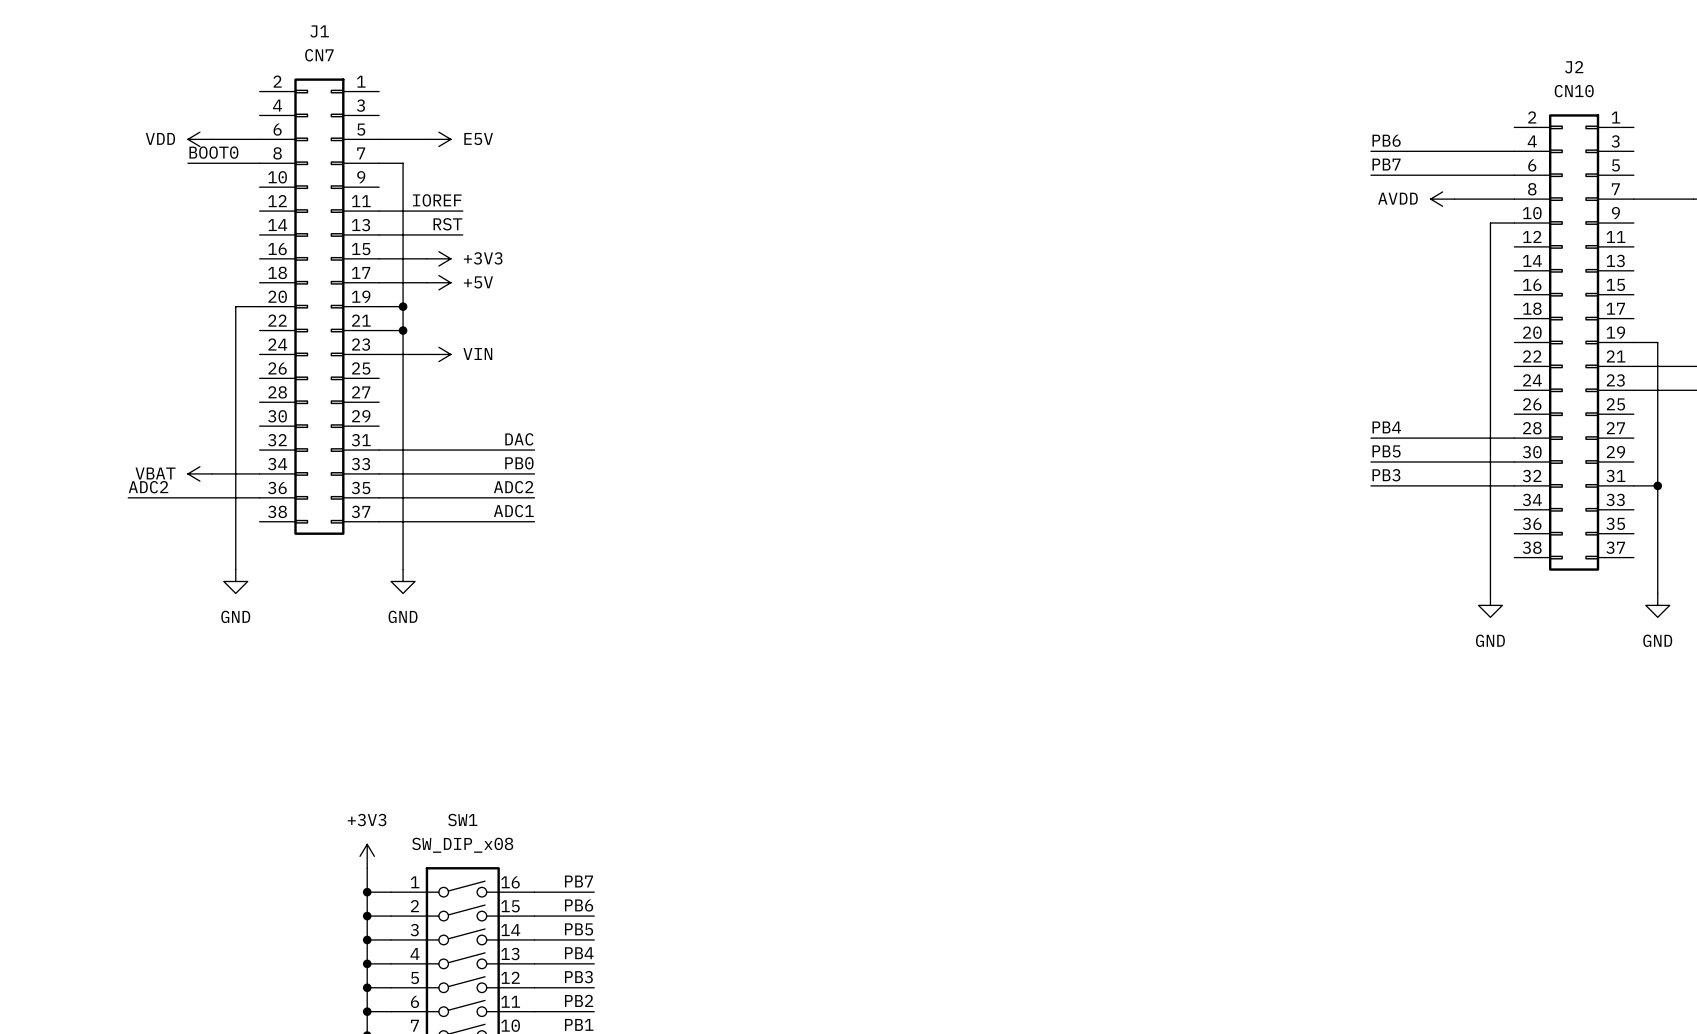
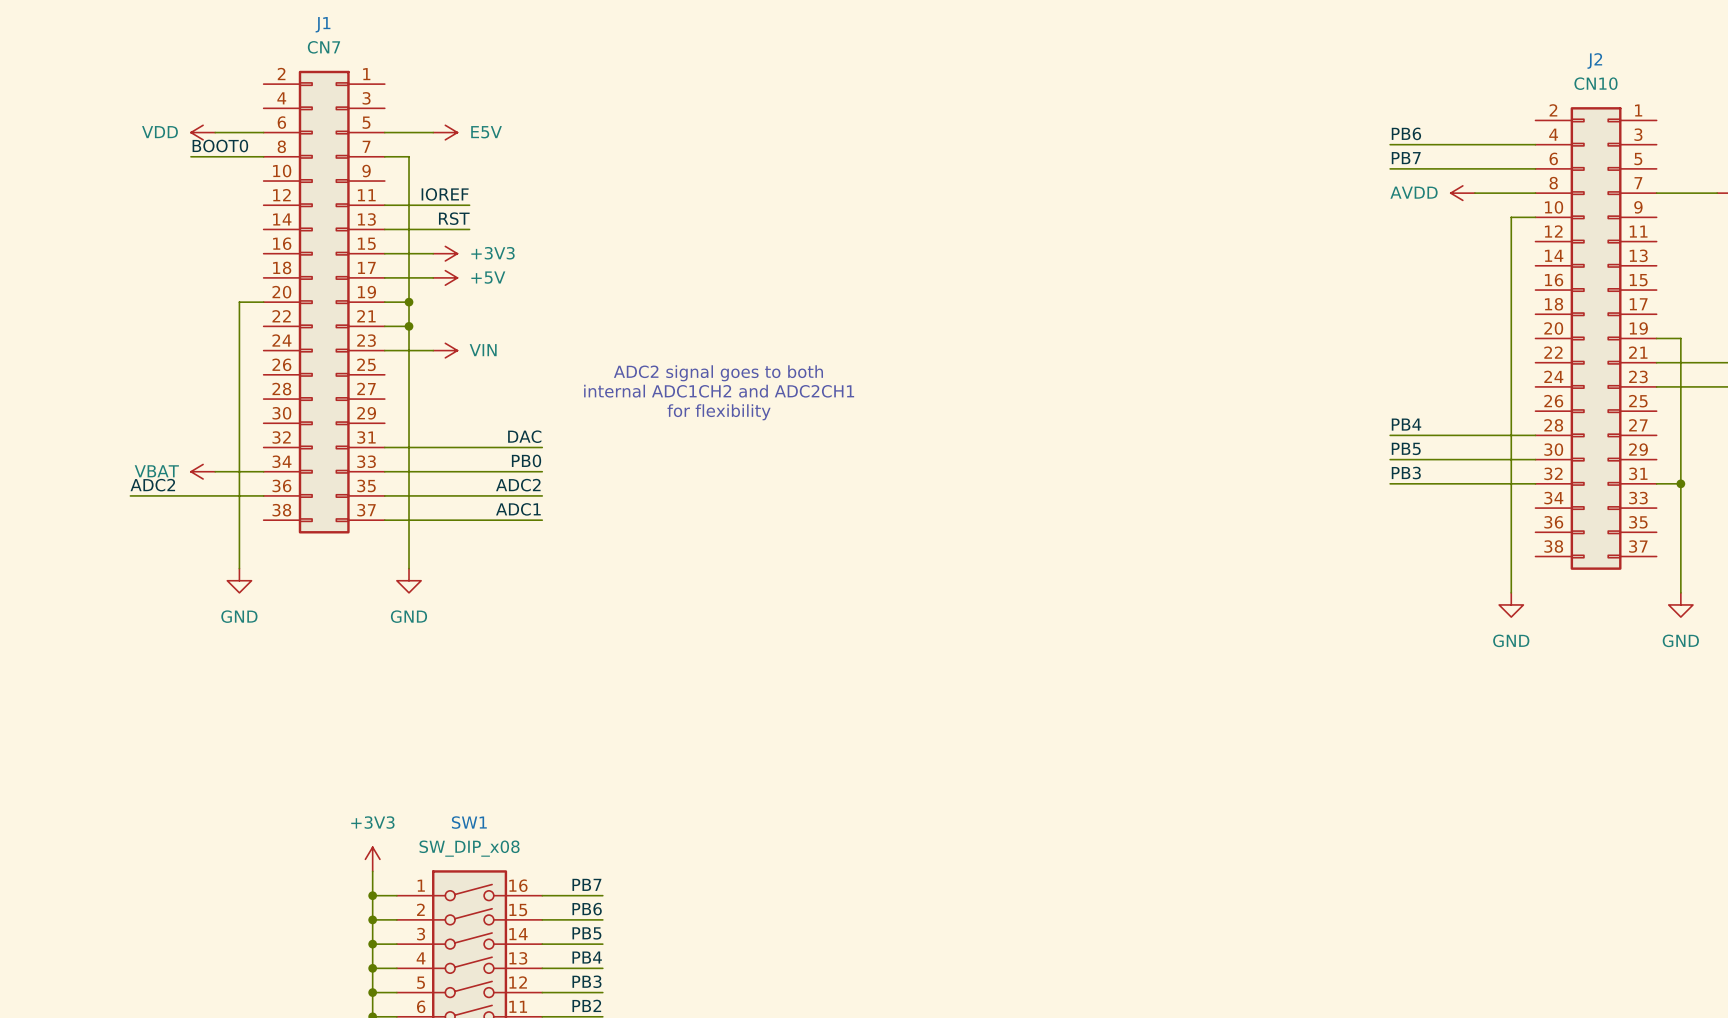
text: none -> ADC2 signal goes to both (718, 373)
text: none -> internal ADC1CH2 and ADC2CH1 (719, 391)
text: none -> for flexibility (719, 412)

